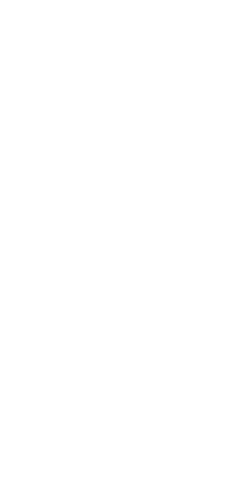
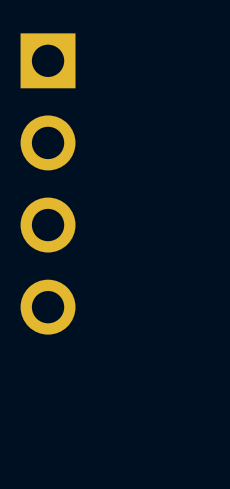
part: none -> (48, 183)

